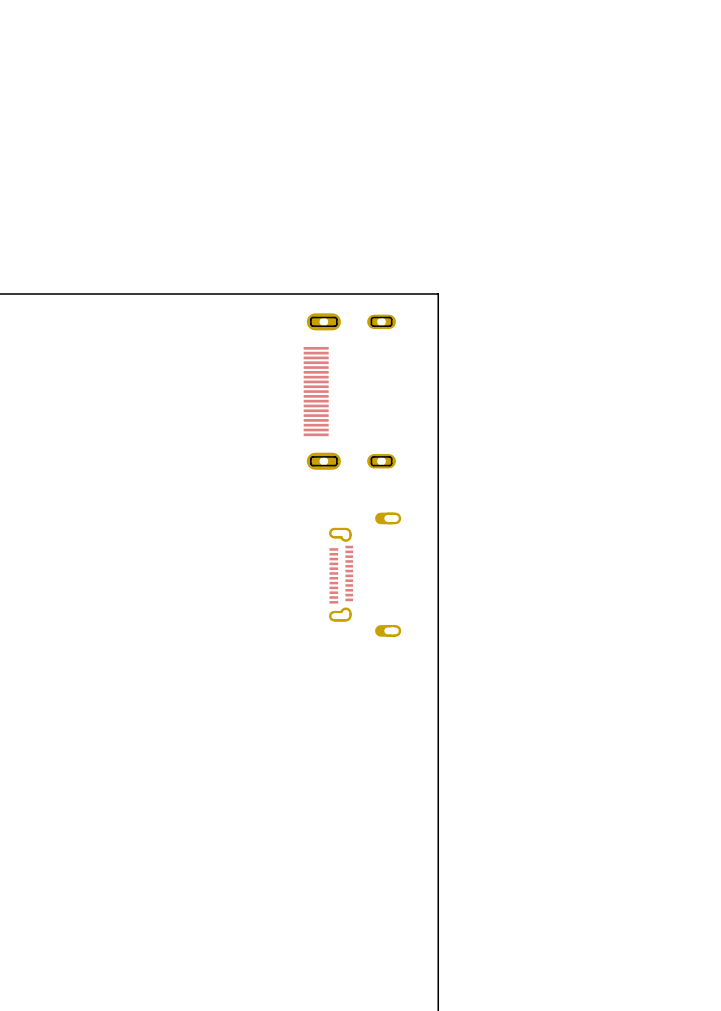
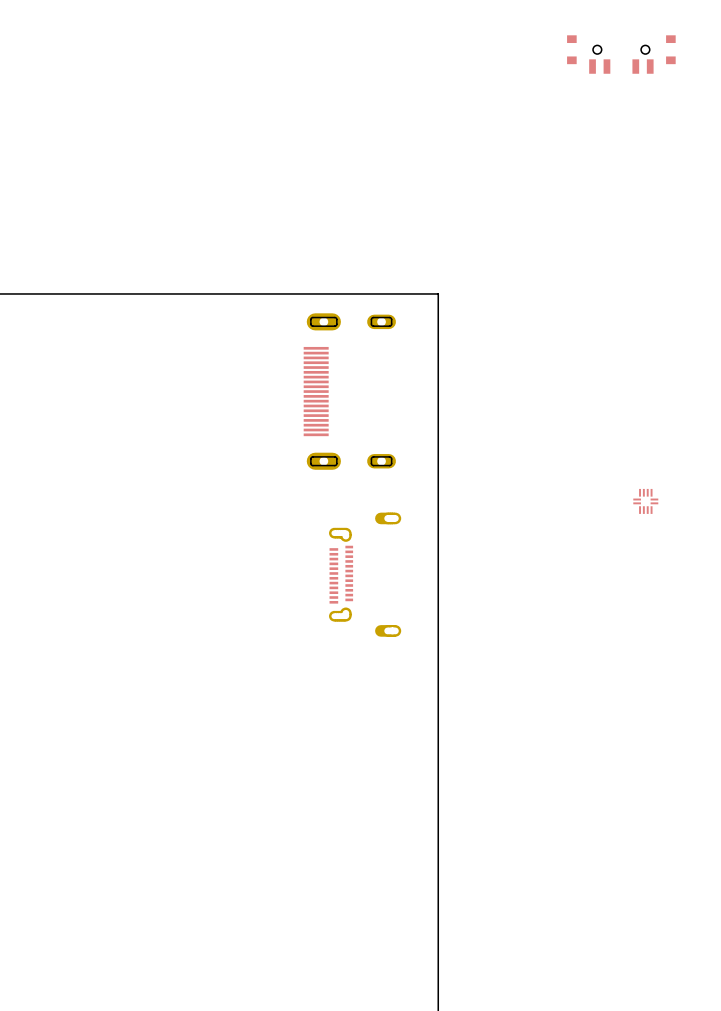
part: none -> (621, 54)
part: none -> (645, 501)

